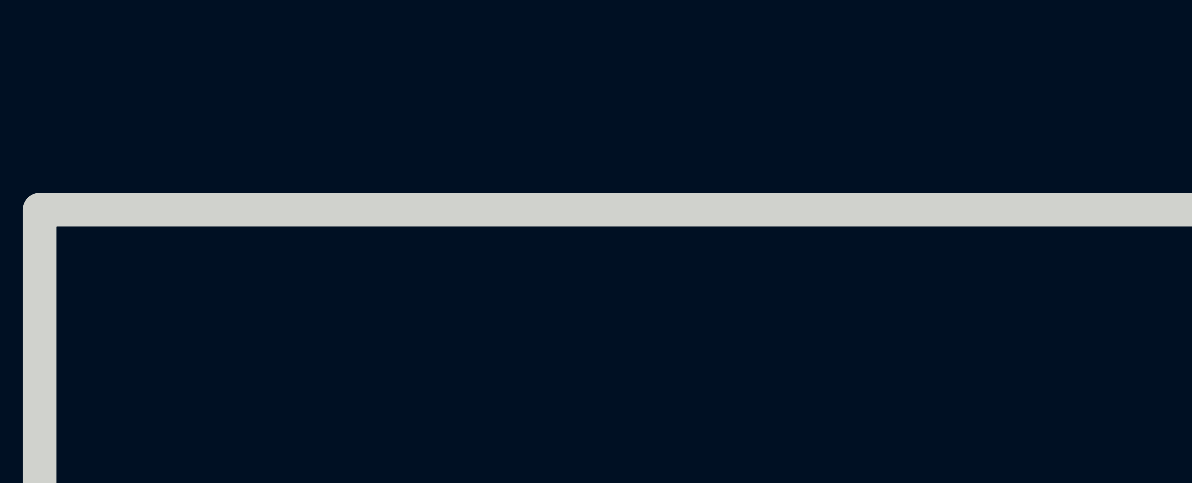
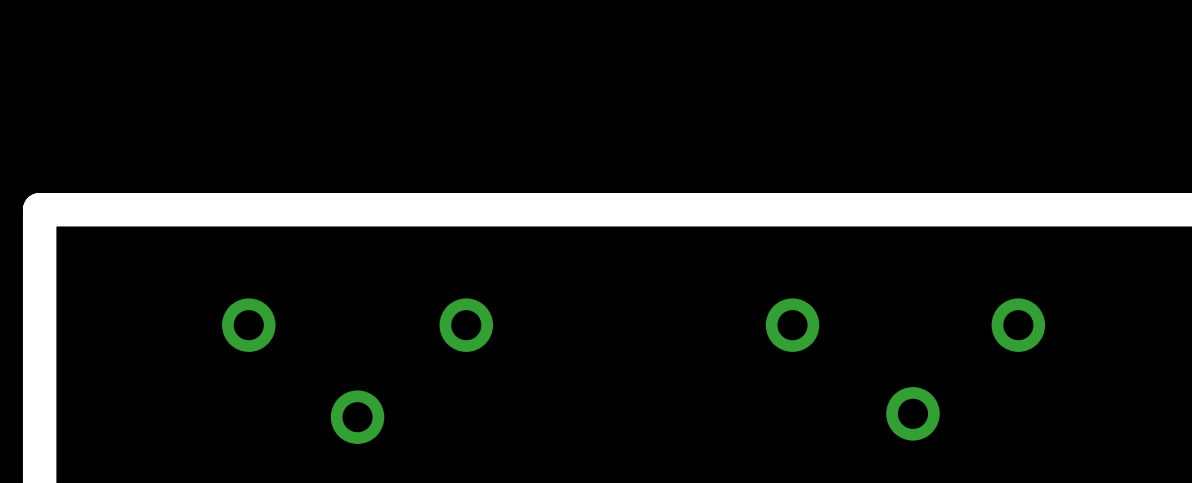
via: none -> (248, 325)
via: none -> (466, 325)
via: none -> (792, 325)
via: none -> (1018, 325)
via: none -> (912, 413)
via: none -> (357, 417)

